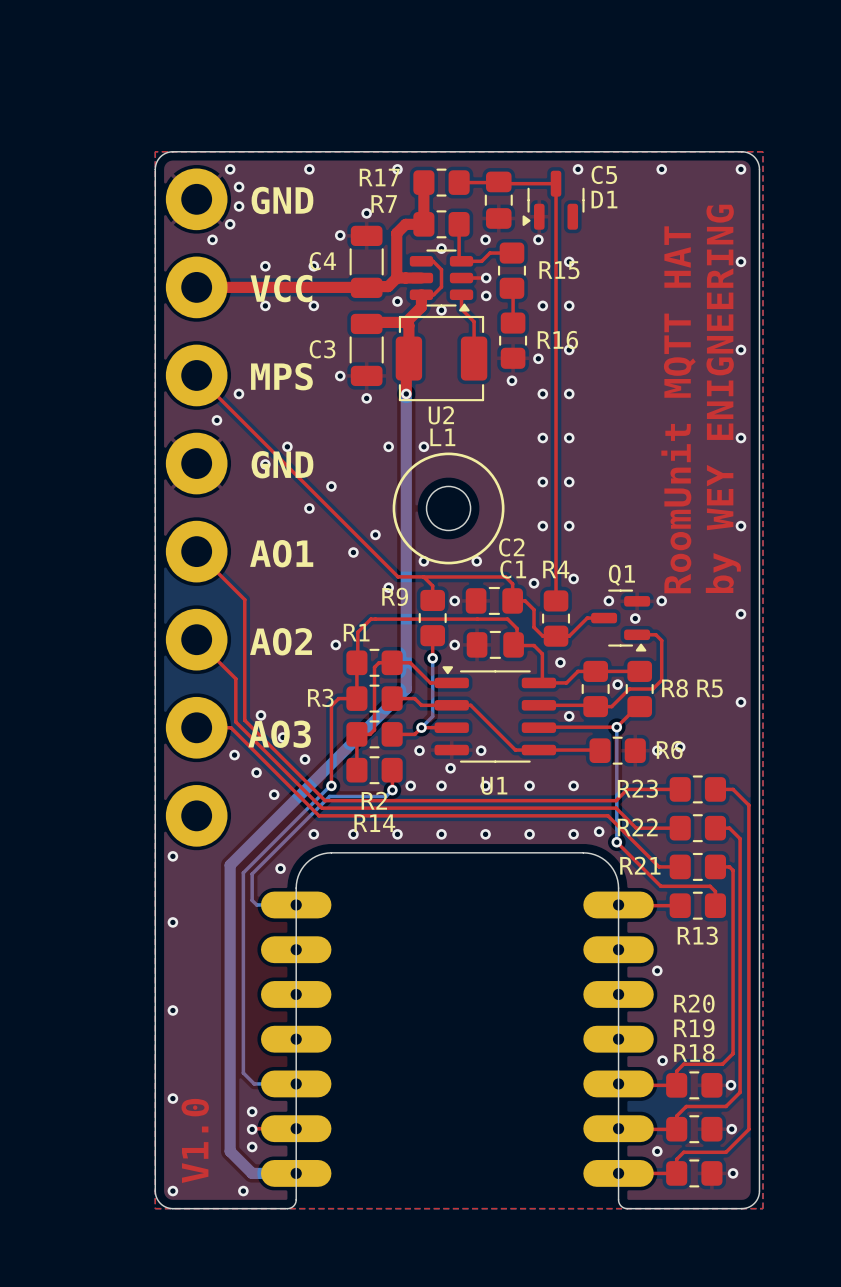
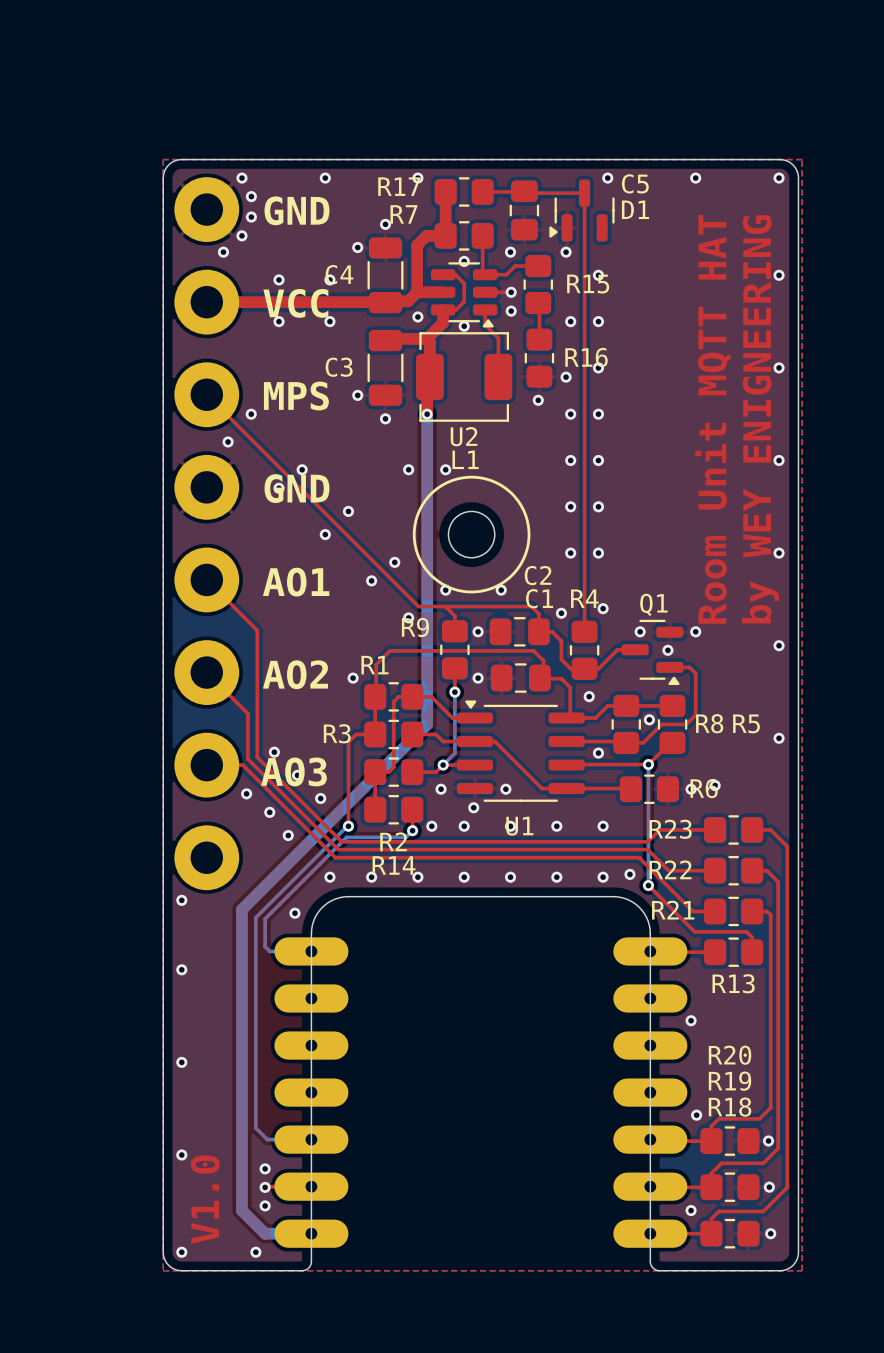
text: RoomUnit MQTT HAT (678, 409) -> Room Unit MQTT HAT (713, 419)

